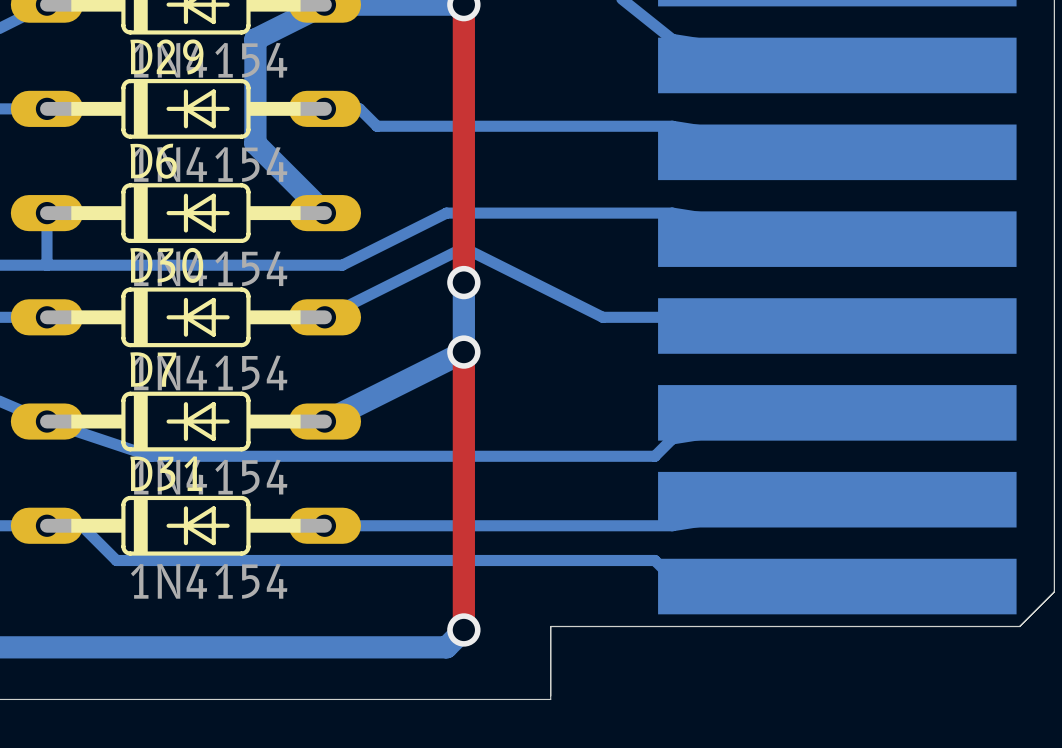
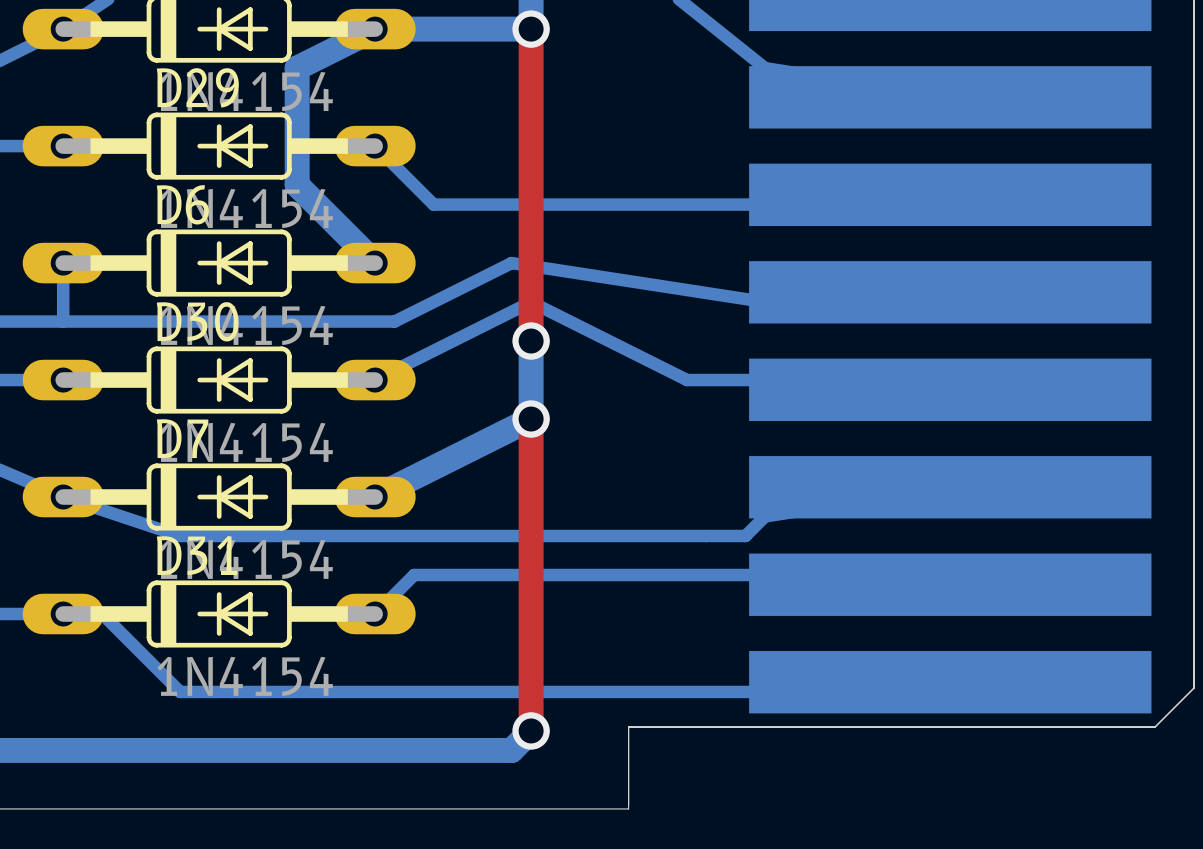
bottom track: (324, 108) (359, 108) (377, 126) (672, 126) (837, 152) -> (375, 146) (433, 204) (765, 204) (950, 194)
bottom track: (446, 213) (672, 213) (837, 239) -> (511, 263) (765, 302) (950, 292)
bottom track: (837, 499) (672, 525) (324, 525) -> (950, 584) (765, 575) (414, 575) (375, 613)
bottom track: (116, 560) (654, 560) (672, 577) (837, 586) -> (141, 652) (180, 691) (784, 691) (804, 672) (950, 682)

